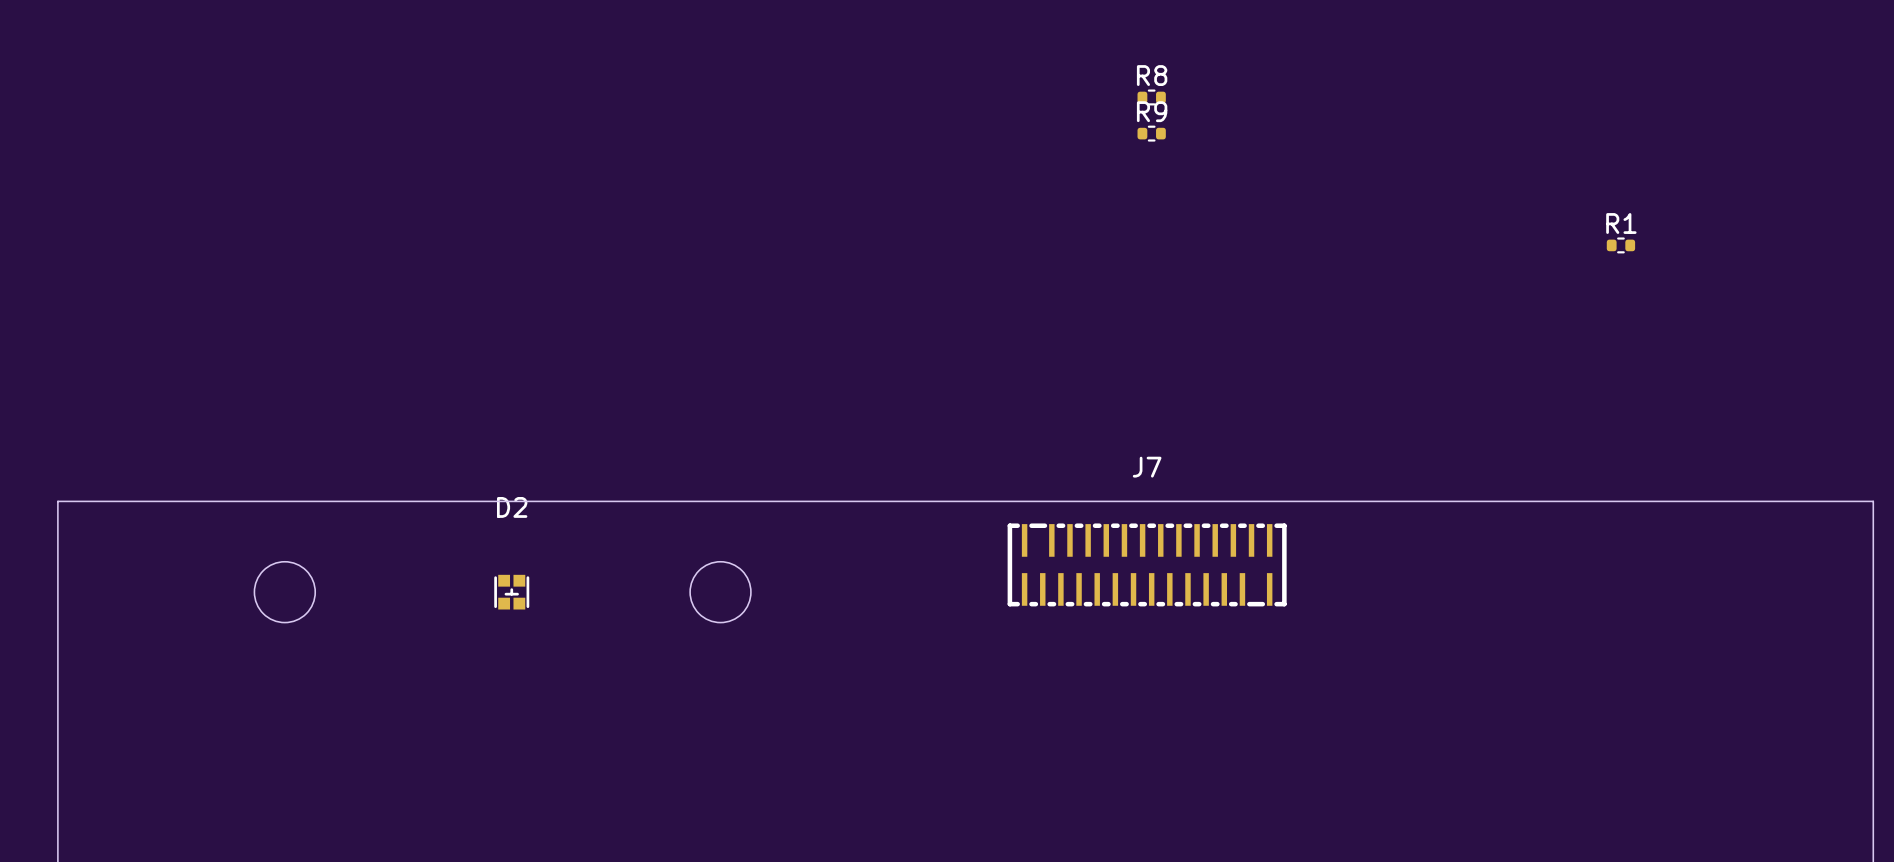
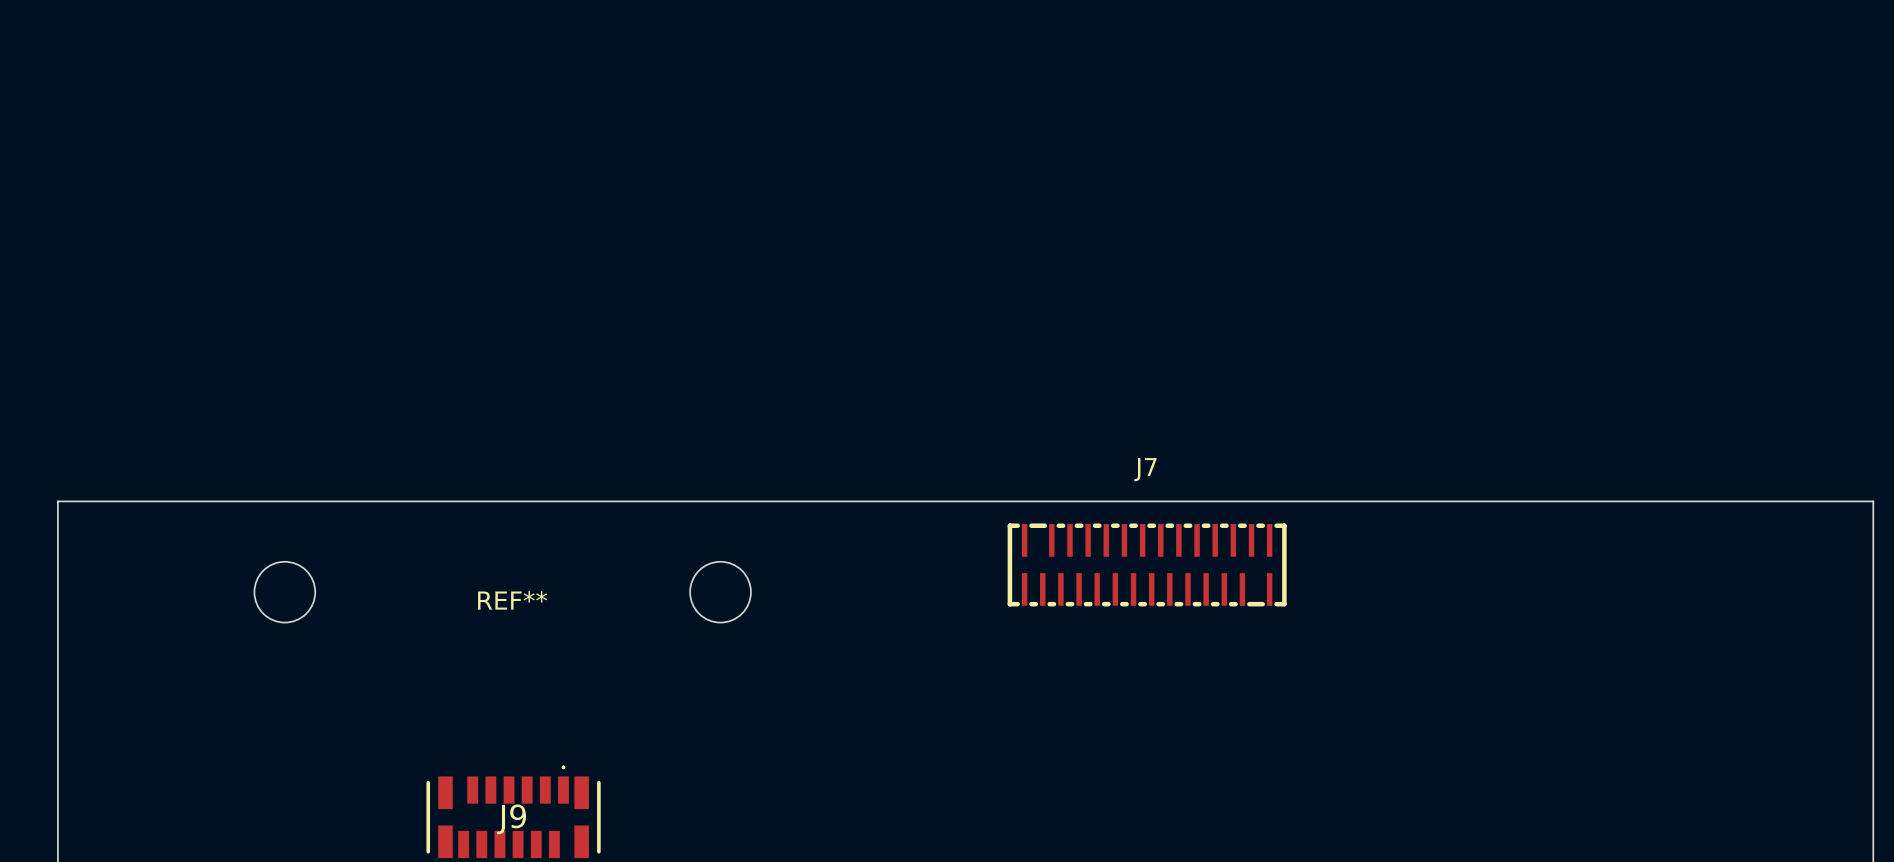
R8: (1151, 97) -> none
R9: (1151, 133) -> none
R1: (1620, 245) -> none
D2: (511, 592) -> none
REF**: none -> (512, 600)
J9: none -> (513, 811)

